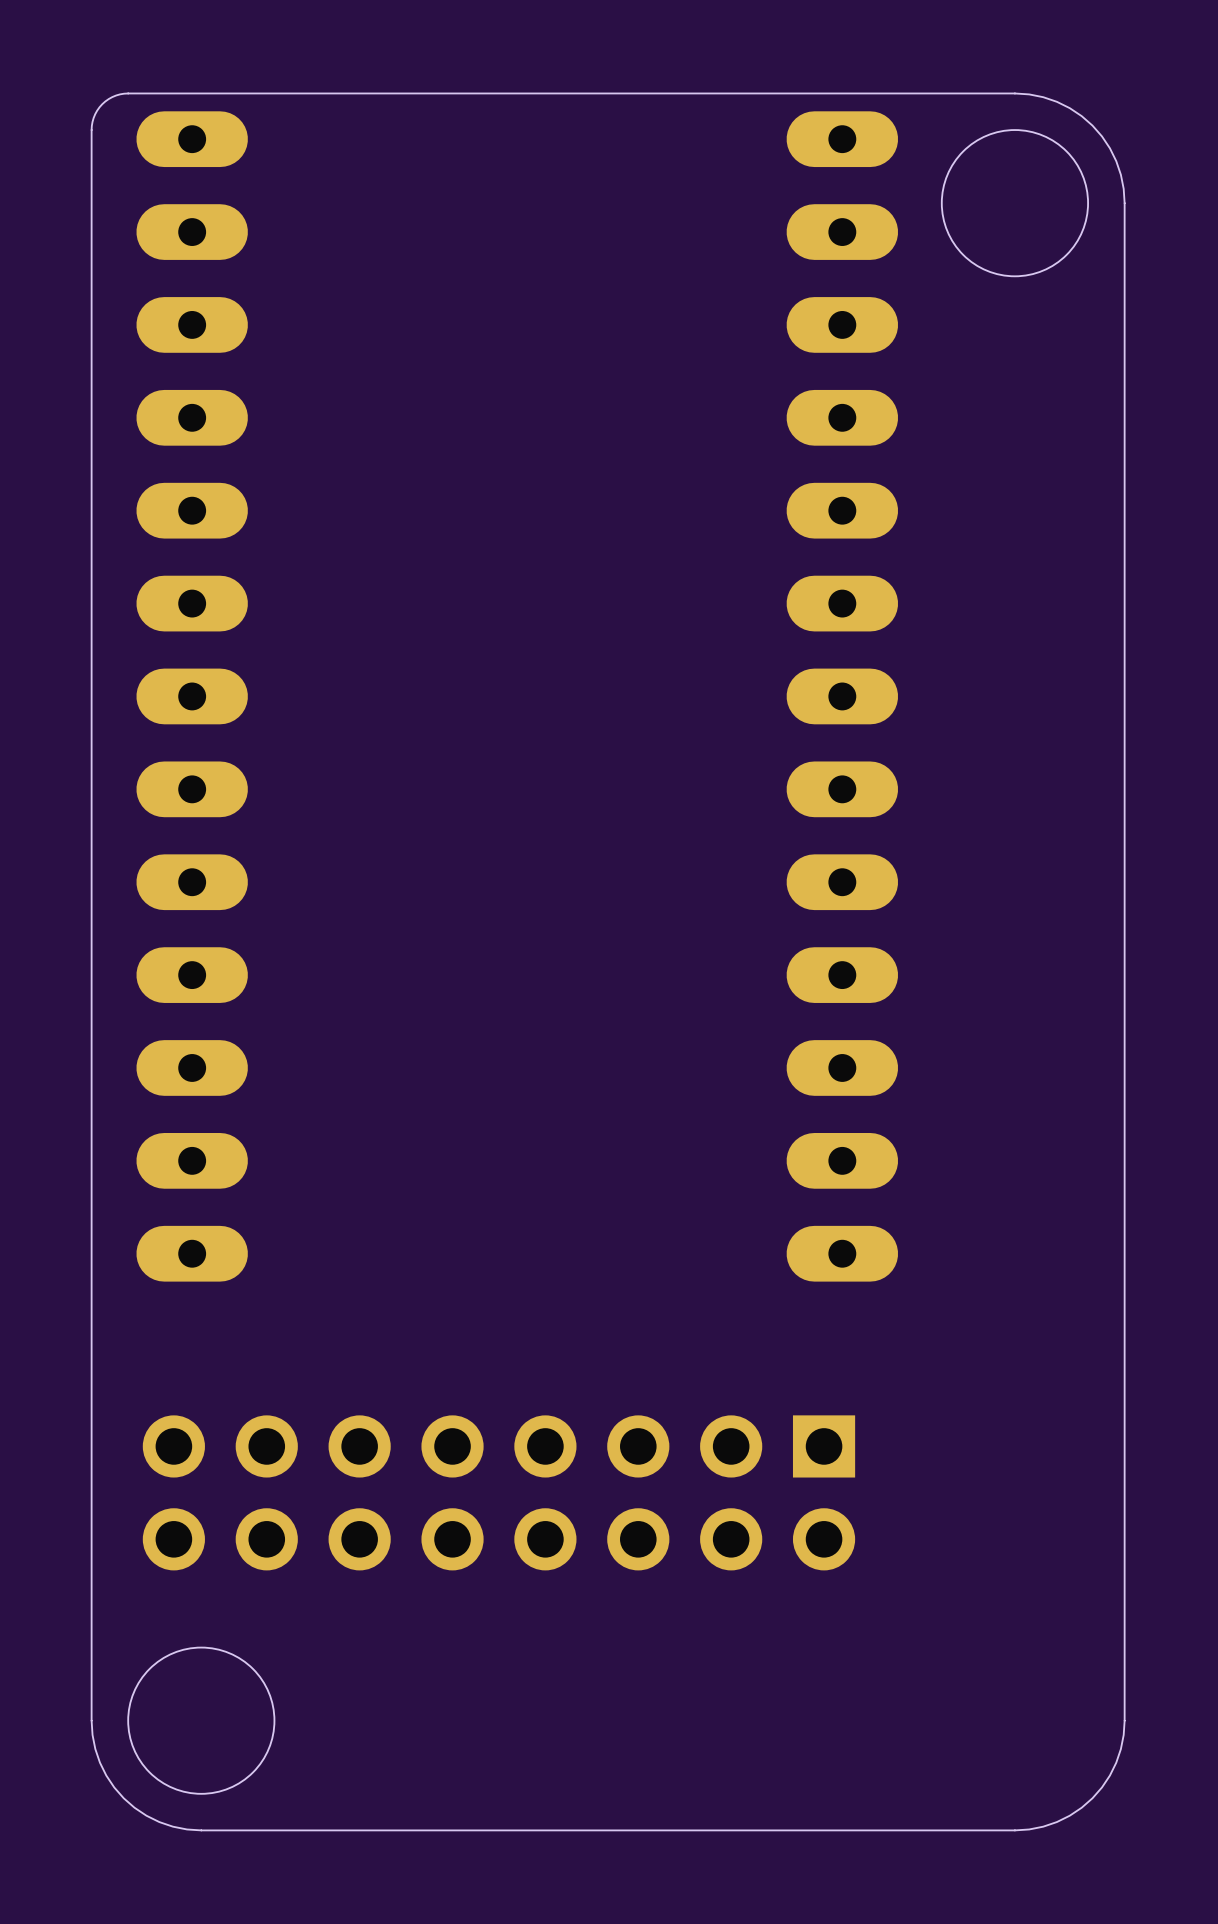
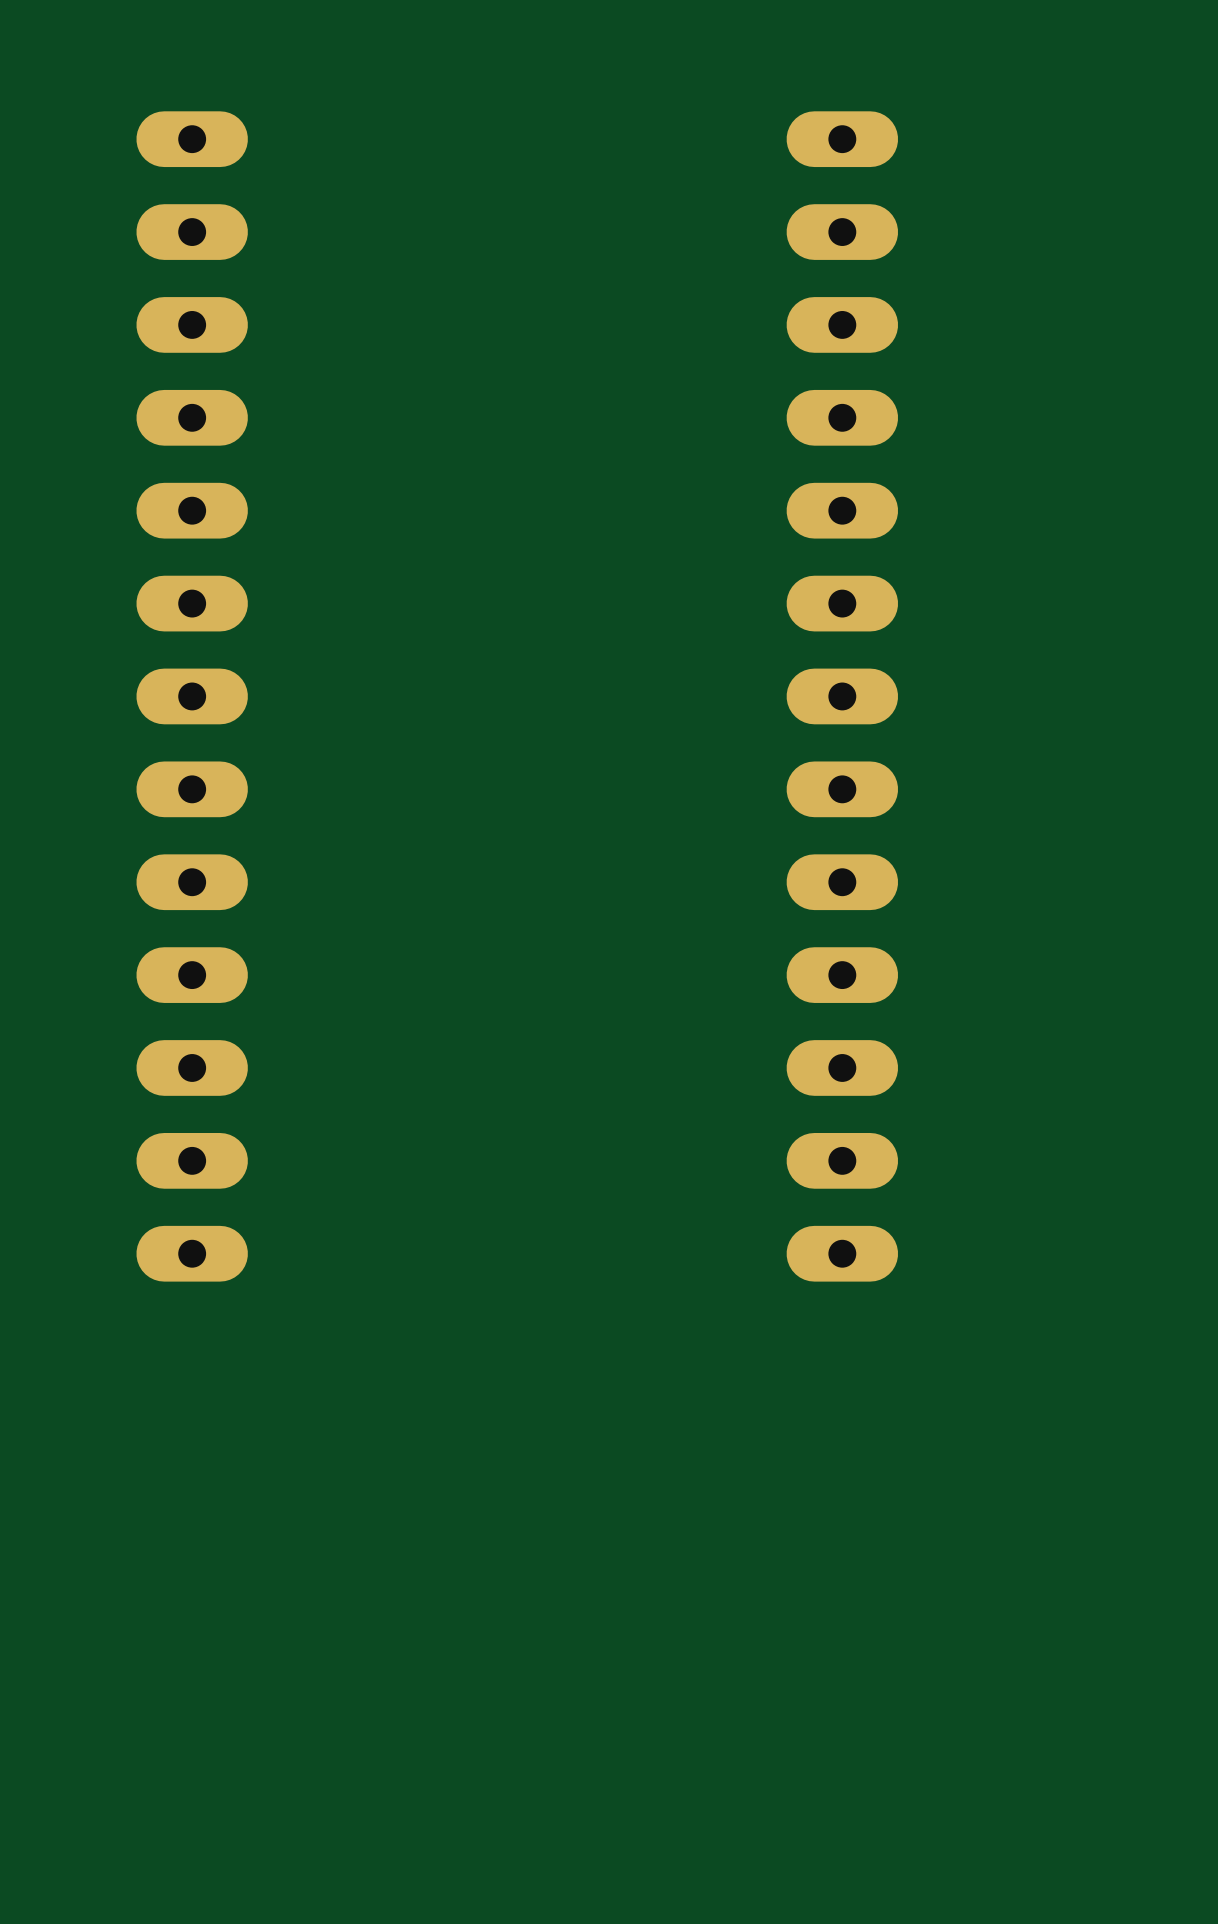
board edge: (1014, 93) (128, 93) (108, 99) (95, 114) (91, 130) (91, 1720) (95, 1749) (106, 1775) (123, 1798) (146, 1815) (172, 1826) (201, 1830) (1014, 1830) (1043, 1826) (1069, 1815) (1092, 1798) (1109, 1775) (1120, 1749) (1124, 1720) (1124, 203) (1123, 188) (1116, 161) (1101, 136) (1092, 125) (1069, 108) (1056, 101) (1043, 97) (1014, 93) -> none
round board edge: [940, 129, 1089, 278] -> none
part: (498, 1492) -> none
round board edge: [127, 1646, 276, 1795] -> none

